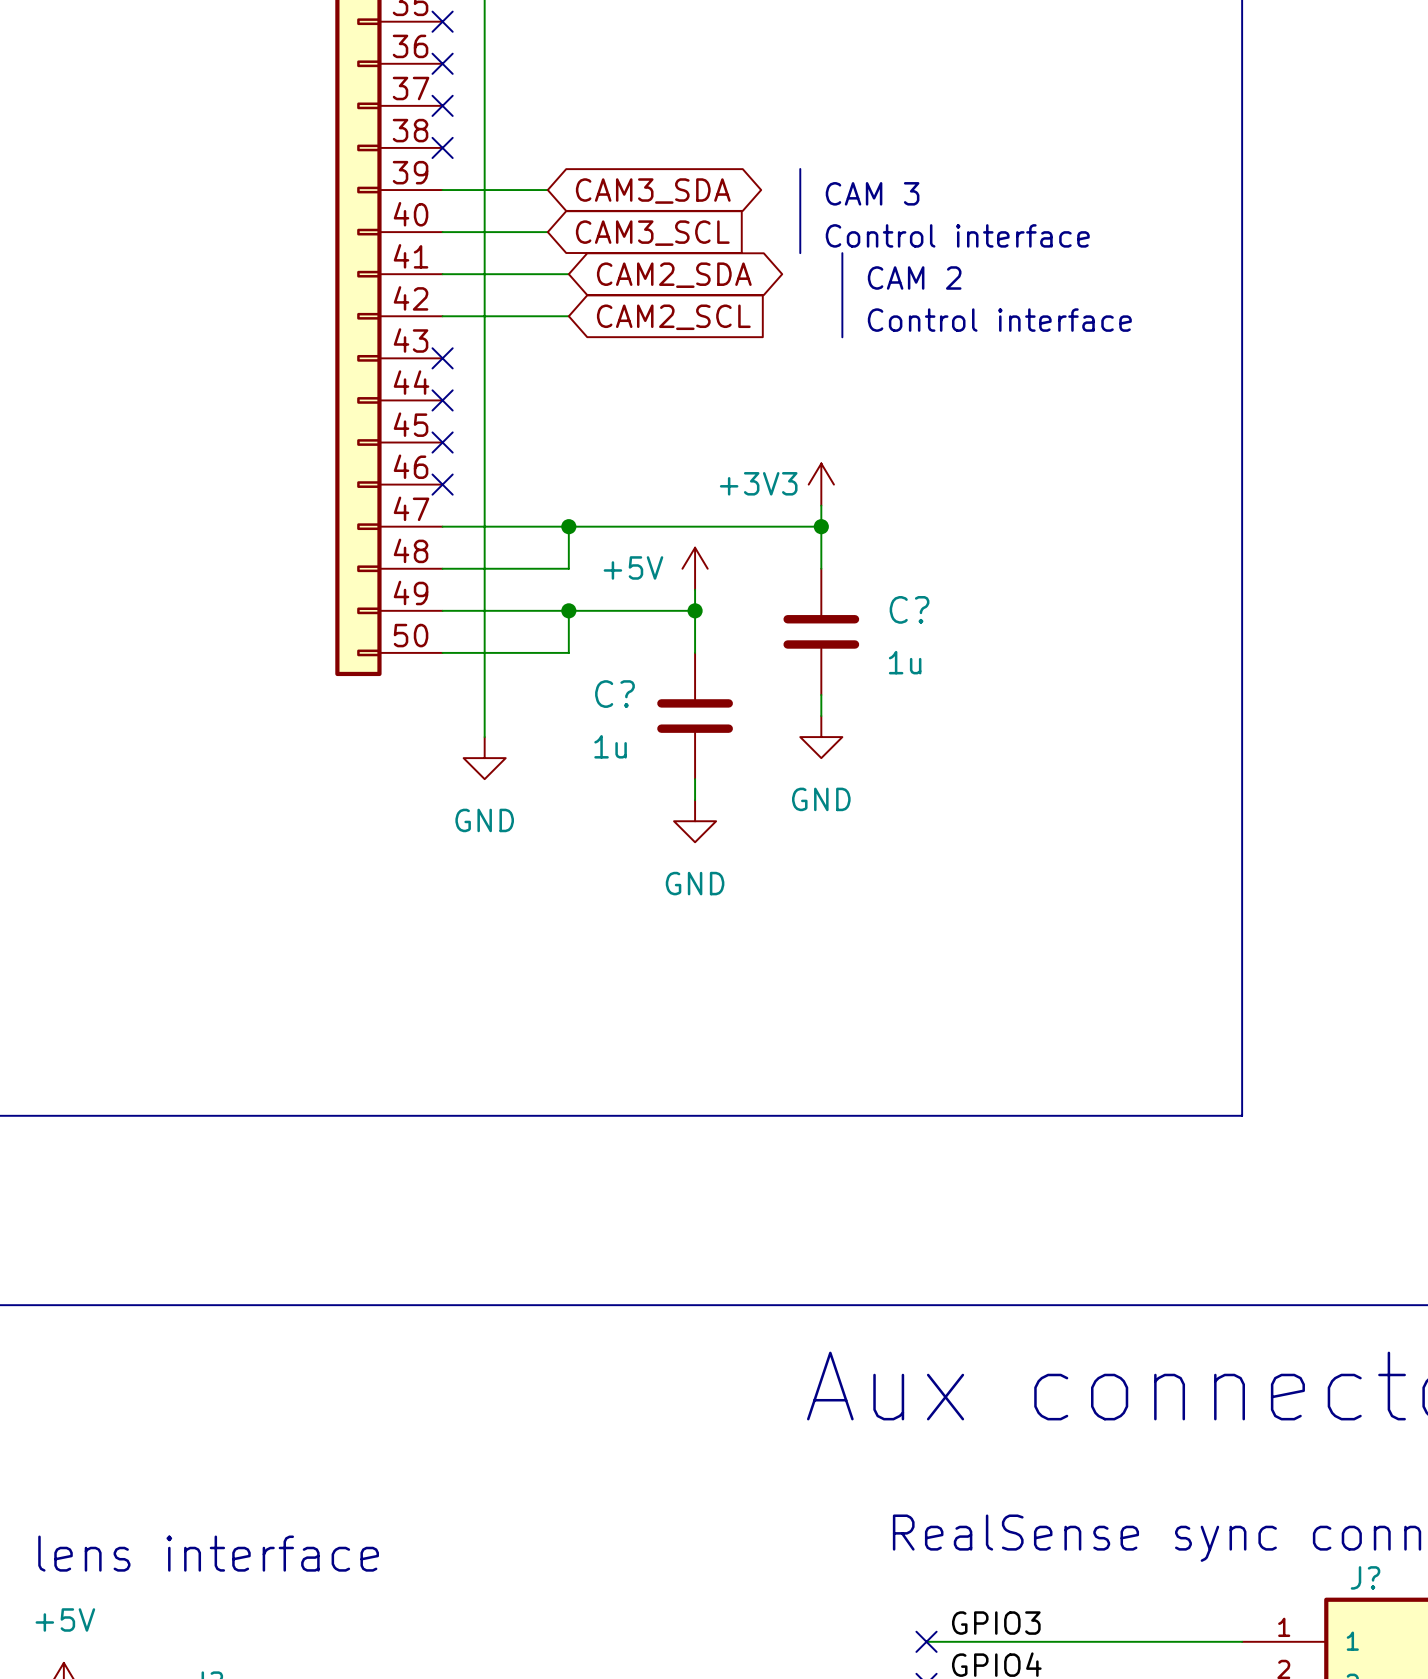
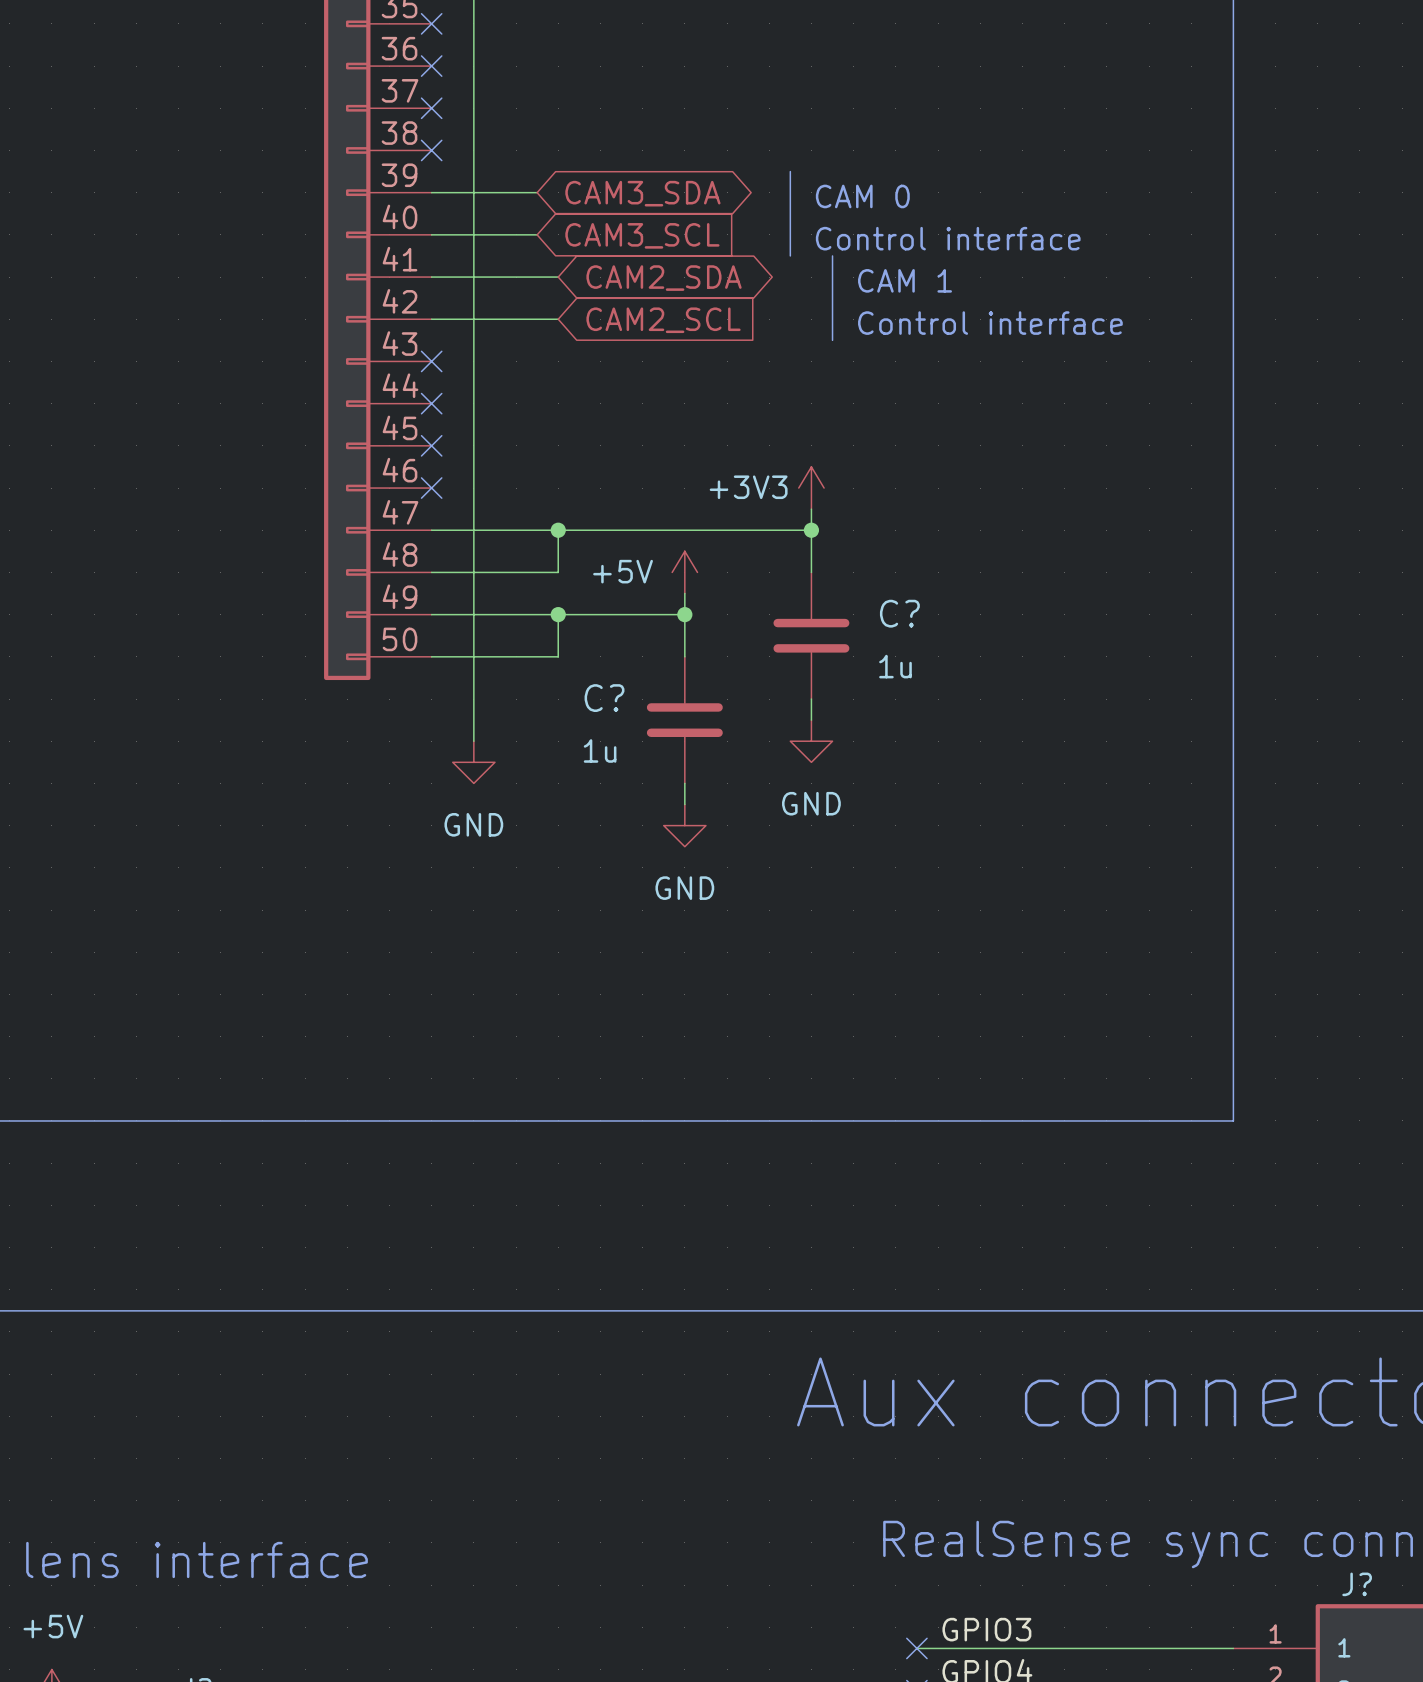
text: CAM 3 (872, 193) -> CAM 0 (862, 196)
text: CAM 2 (914, 277) -> CAM 1 (905, 280)

